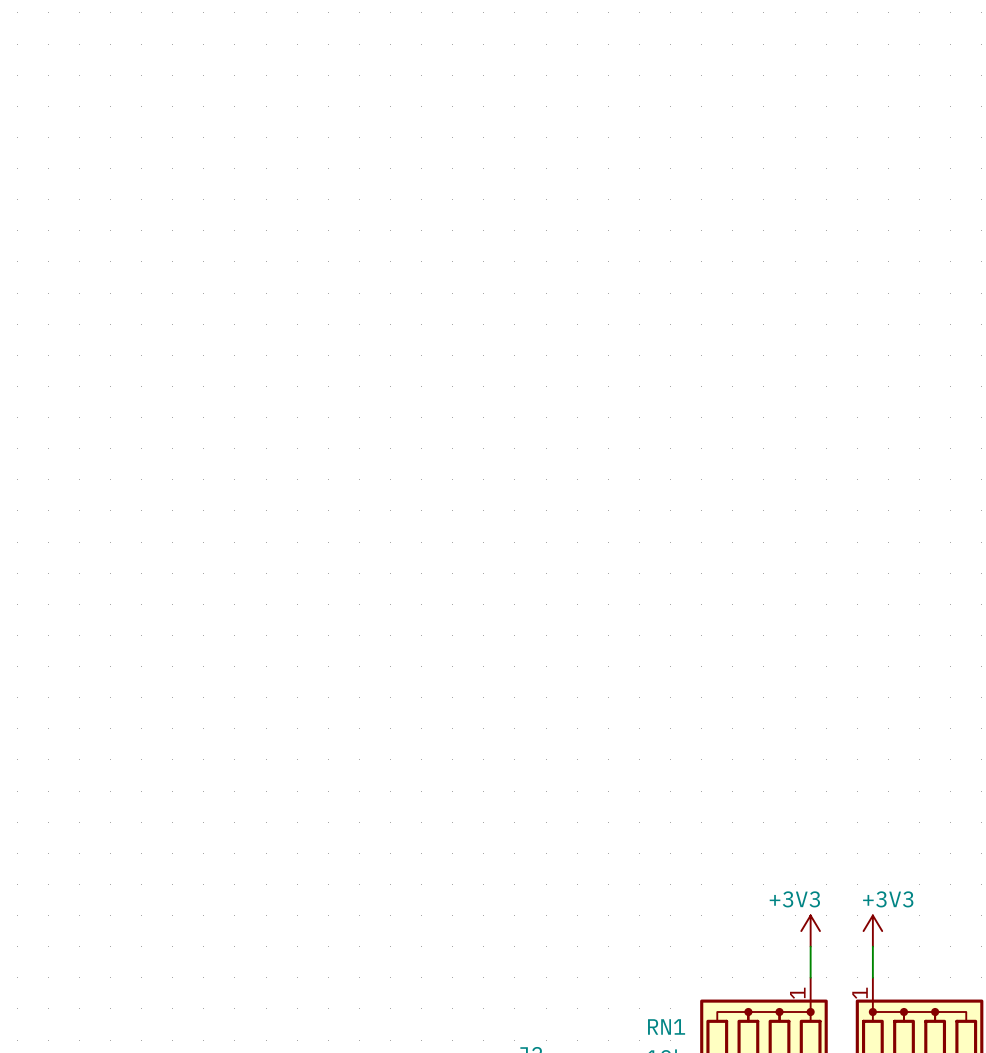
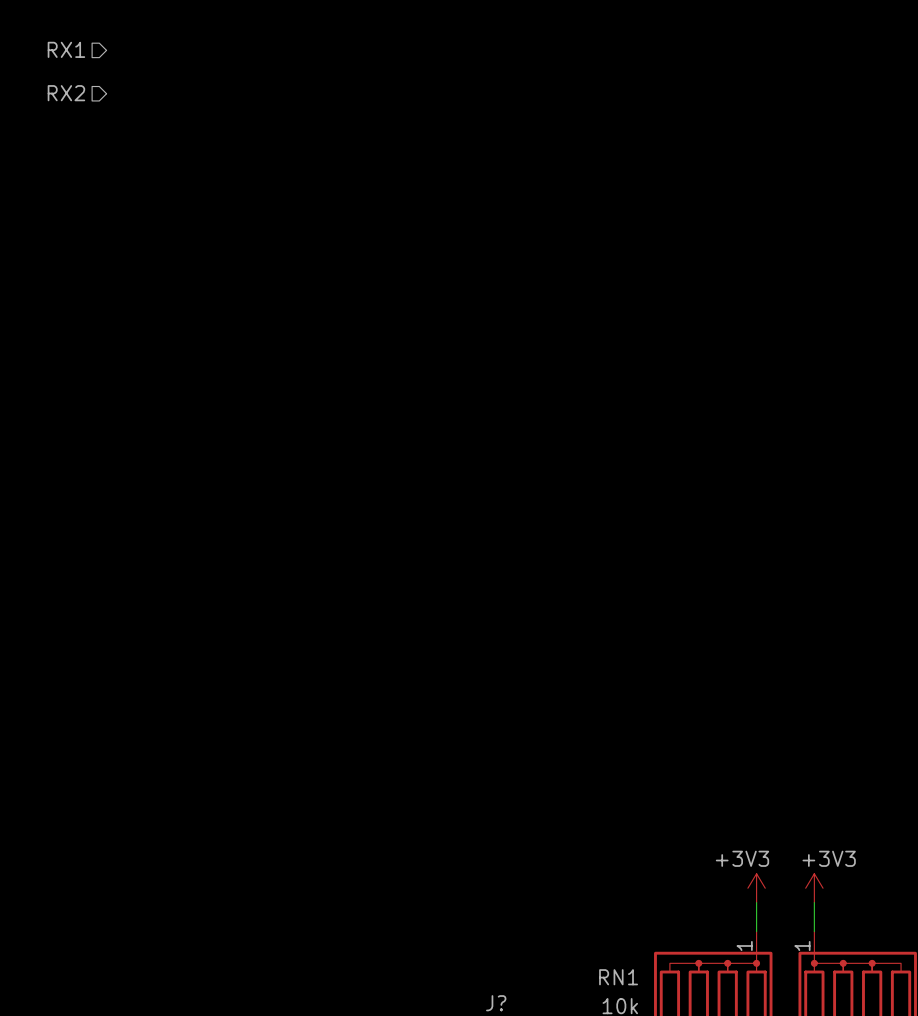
hierarchical label: none -> RX1 (66, 49)
hierarchical label: none -> RX2 (66, 93)

